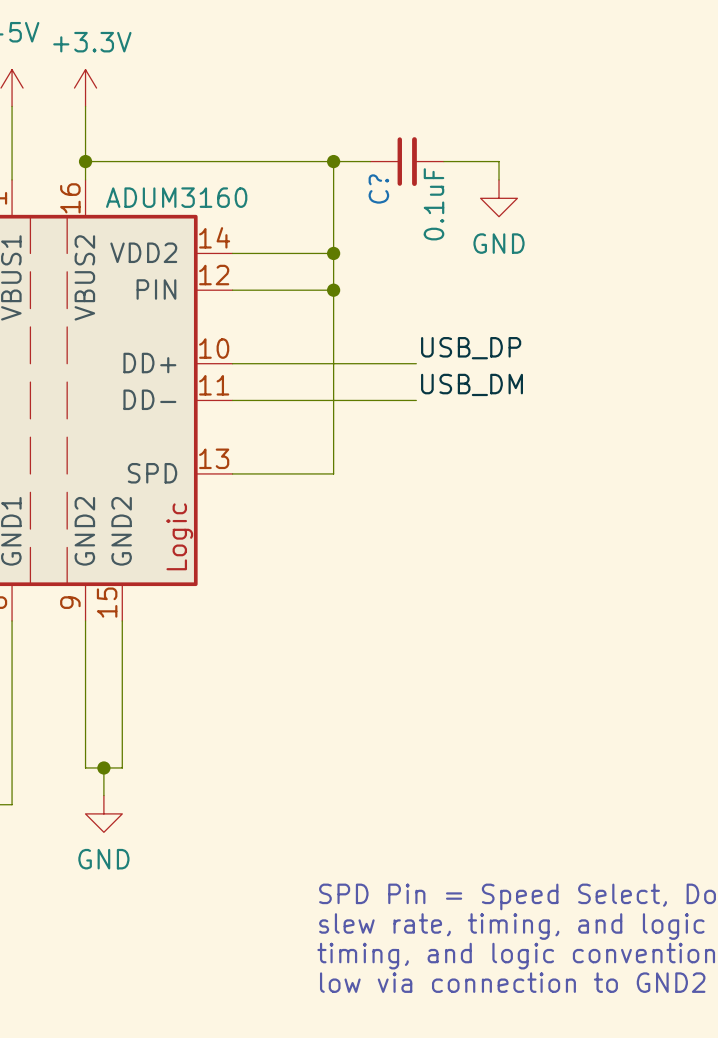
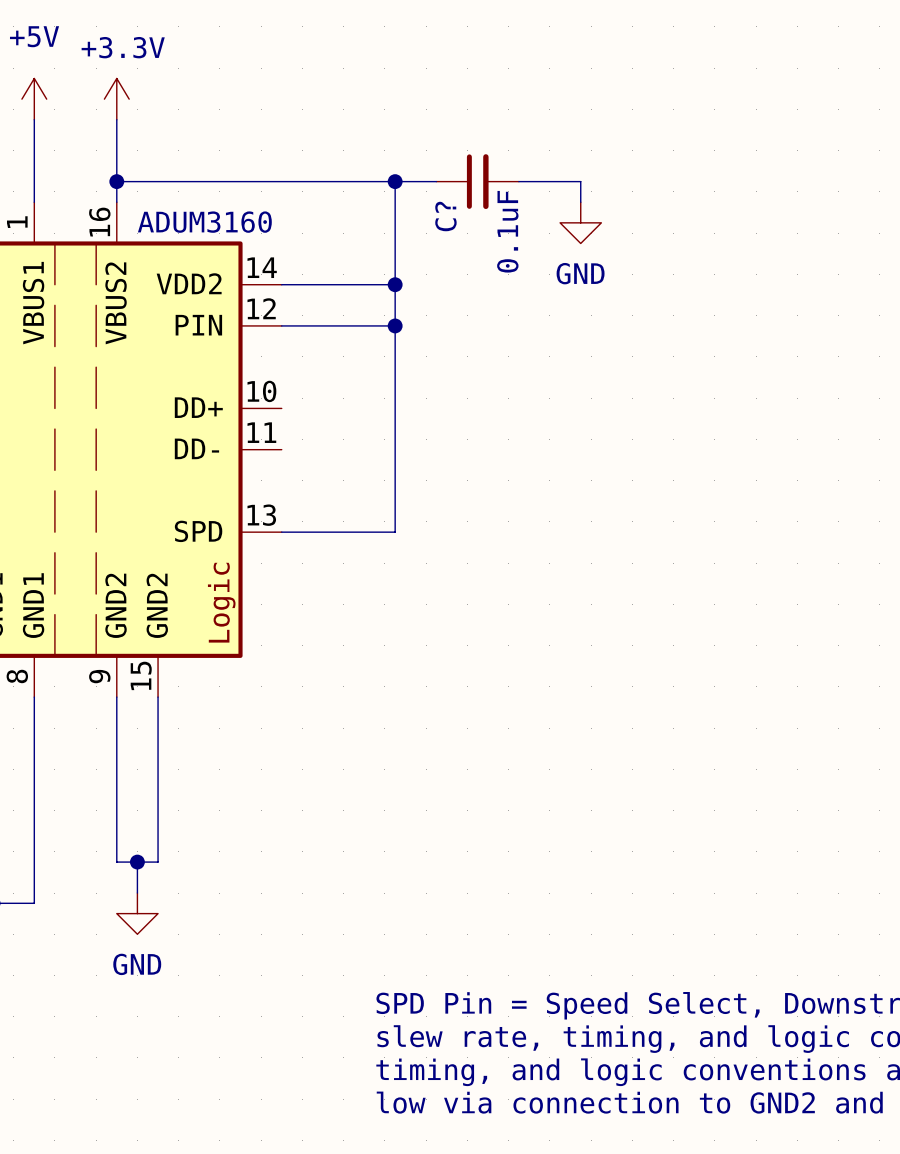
label: USB_DP (471, 348) -> none
wire: (232, 363) (416, 363) -> none
label: USB_DM (472, 384) -> none
wire: (232, 400) (416, 400) -> none

